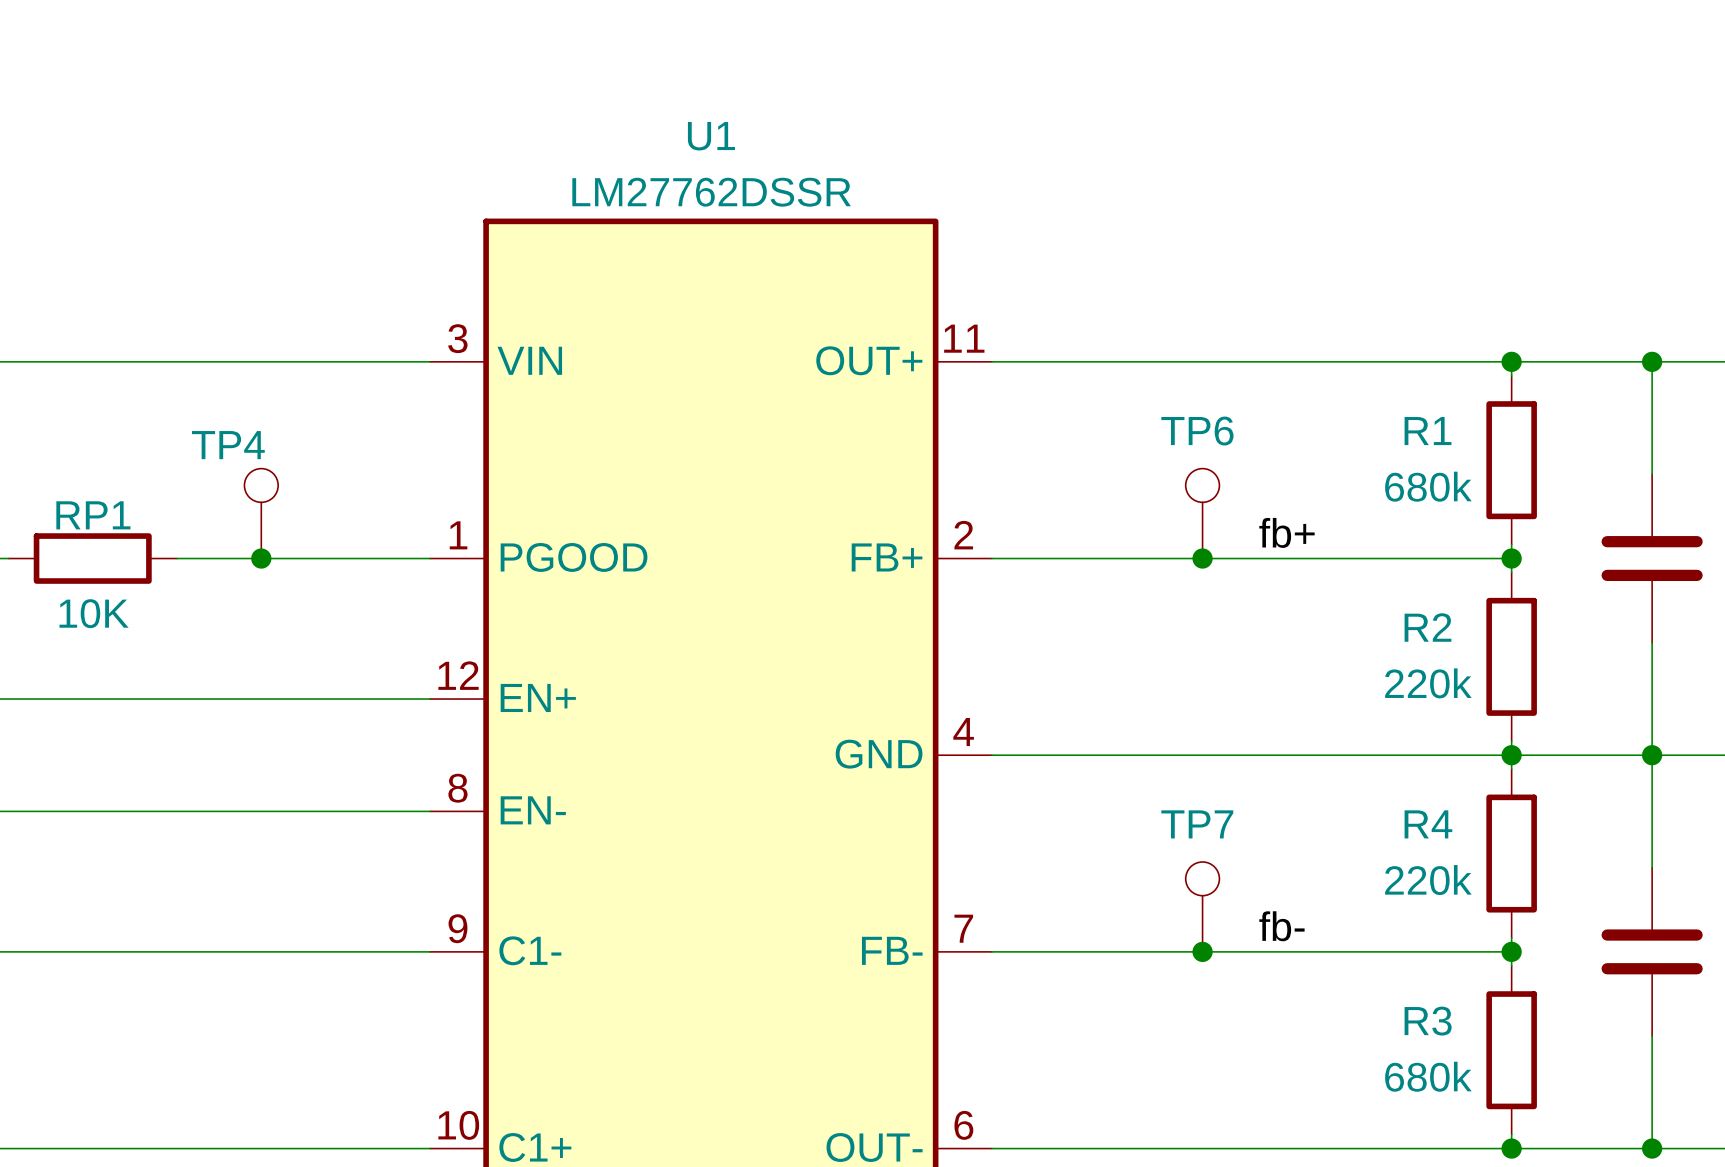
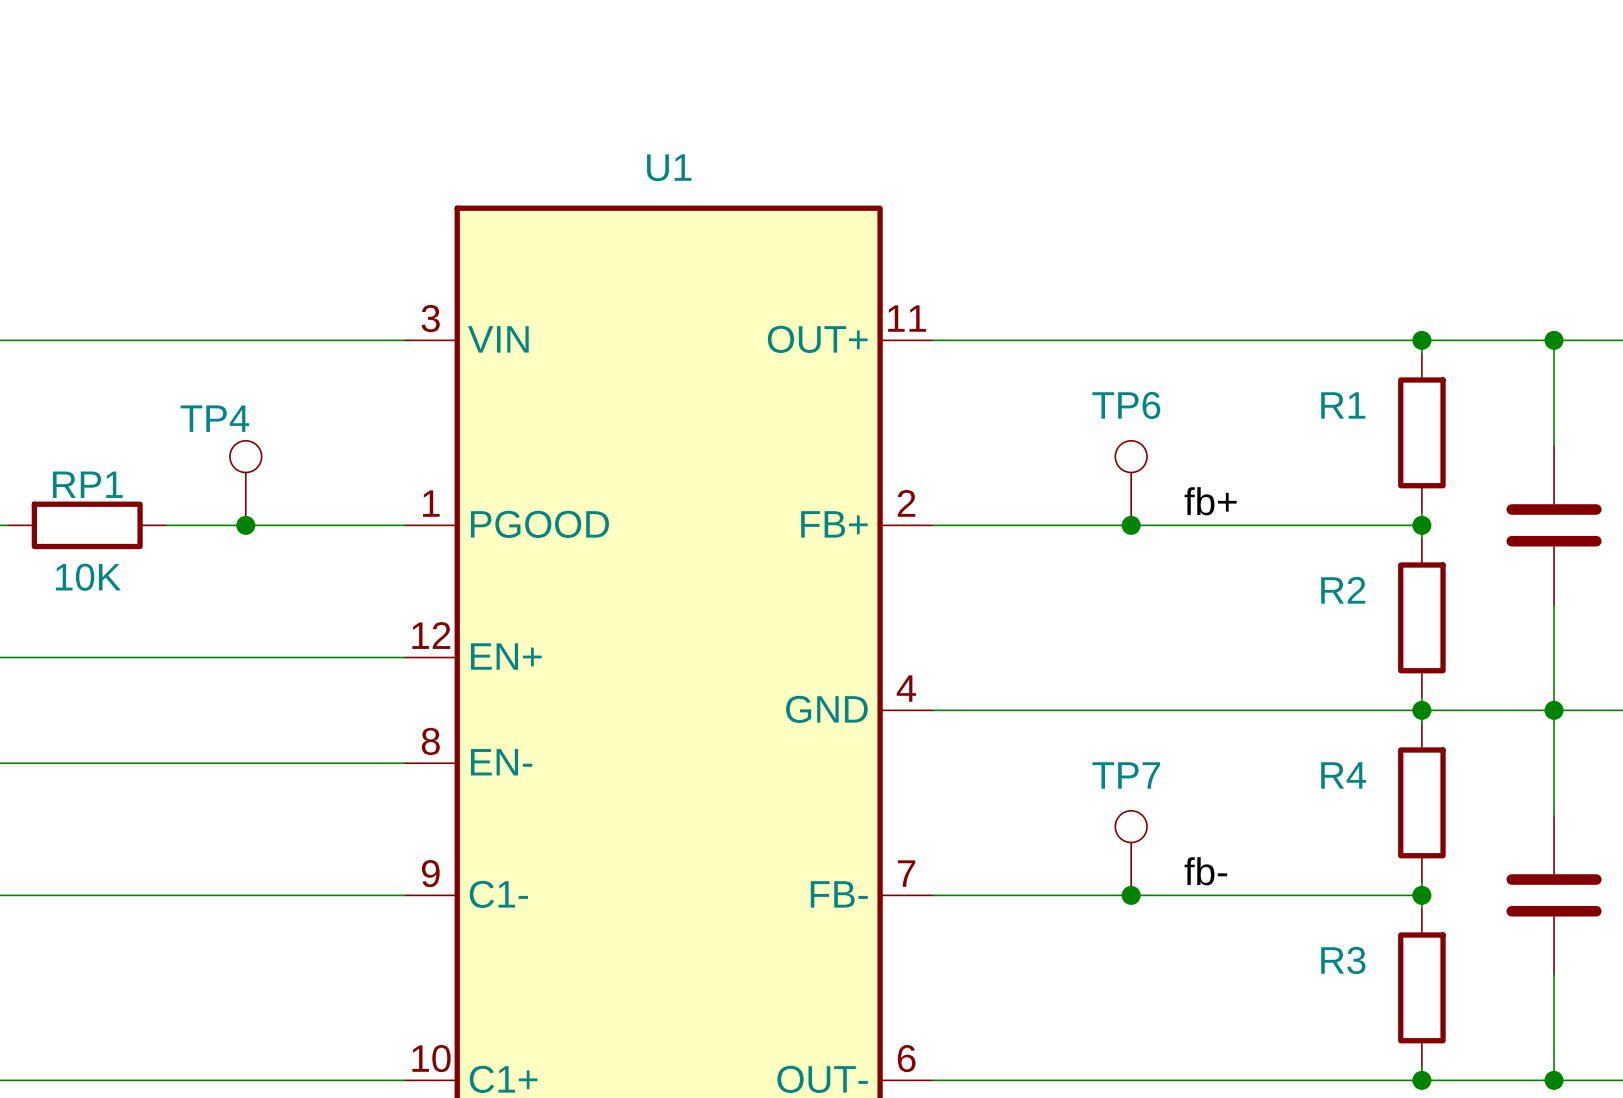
U1 name position: U1 (711, 136) -> U1 (669, 167)
U1 value: LM27762DSSR (711, 192) -> none
R1 value: 680k (1428, 486) -> none
R2 value: 220k (1428, 683) -> none
R4 value: 220k (1428, 880) -> none
R3 value: 680k (1428, 1076) -> none

